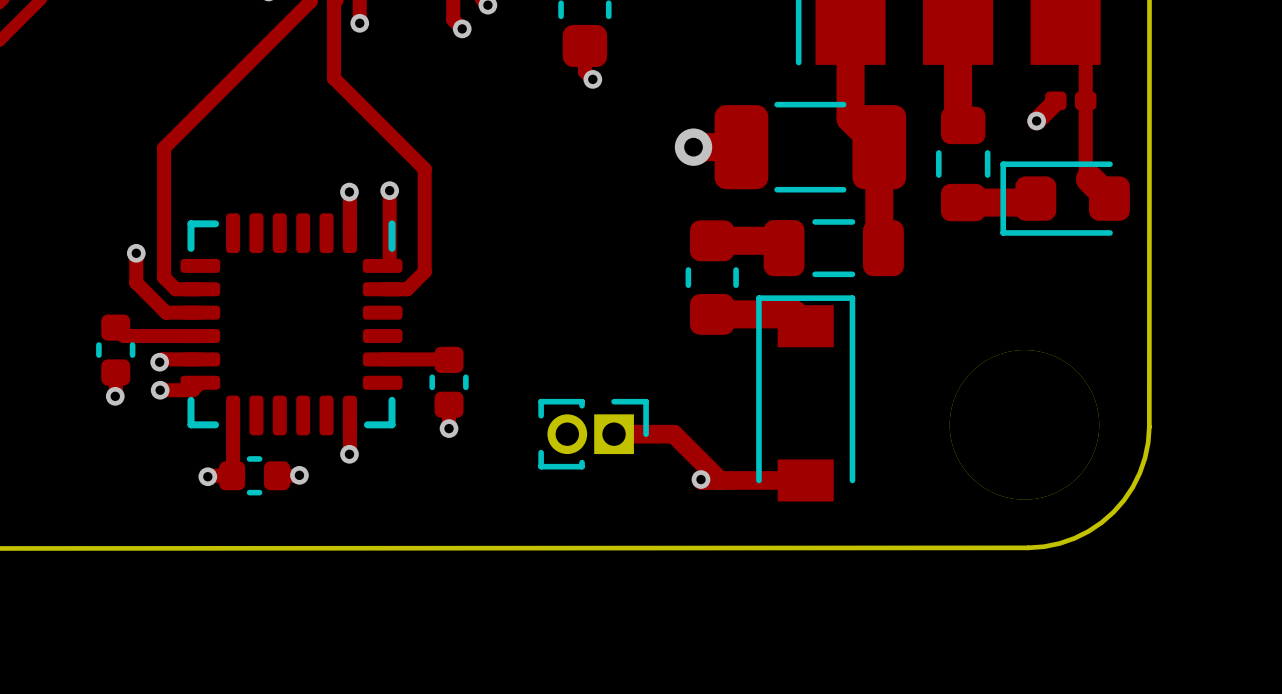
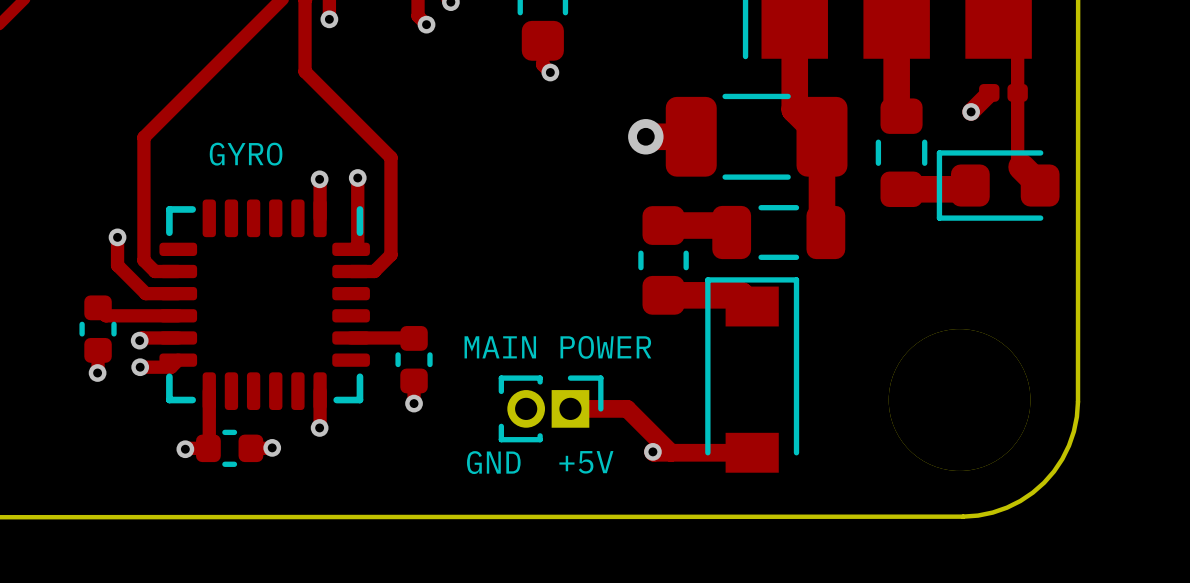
text: none -> GYRO (246, 154)
text: none -> MAIN POWER (557, 347)
text: none -> GND (493, 462)
text: none -> +5V (586, 462)

